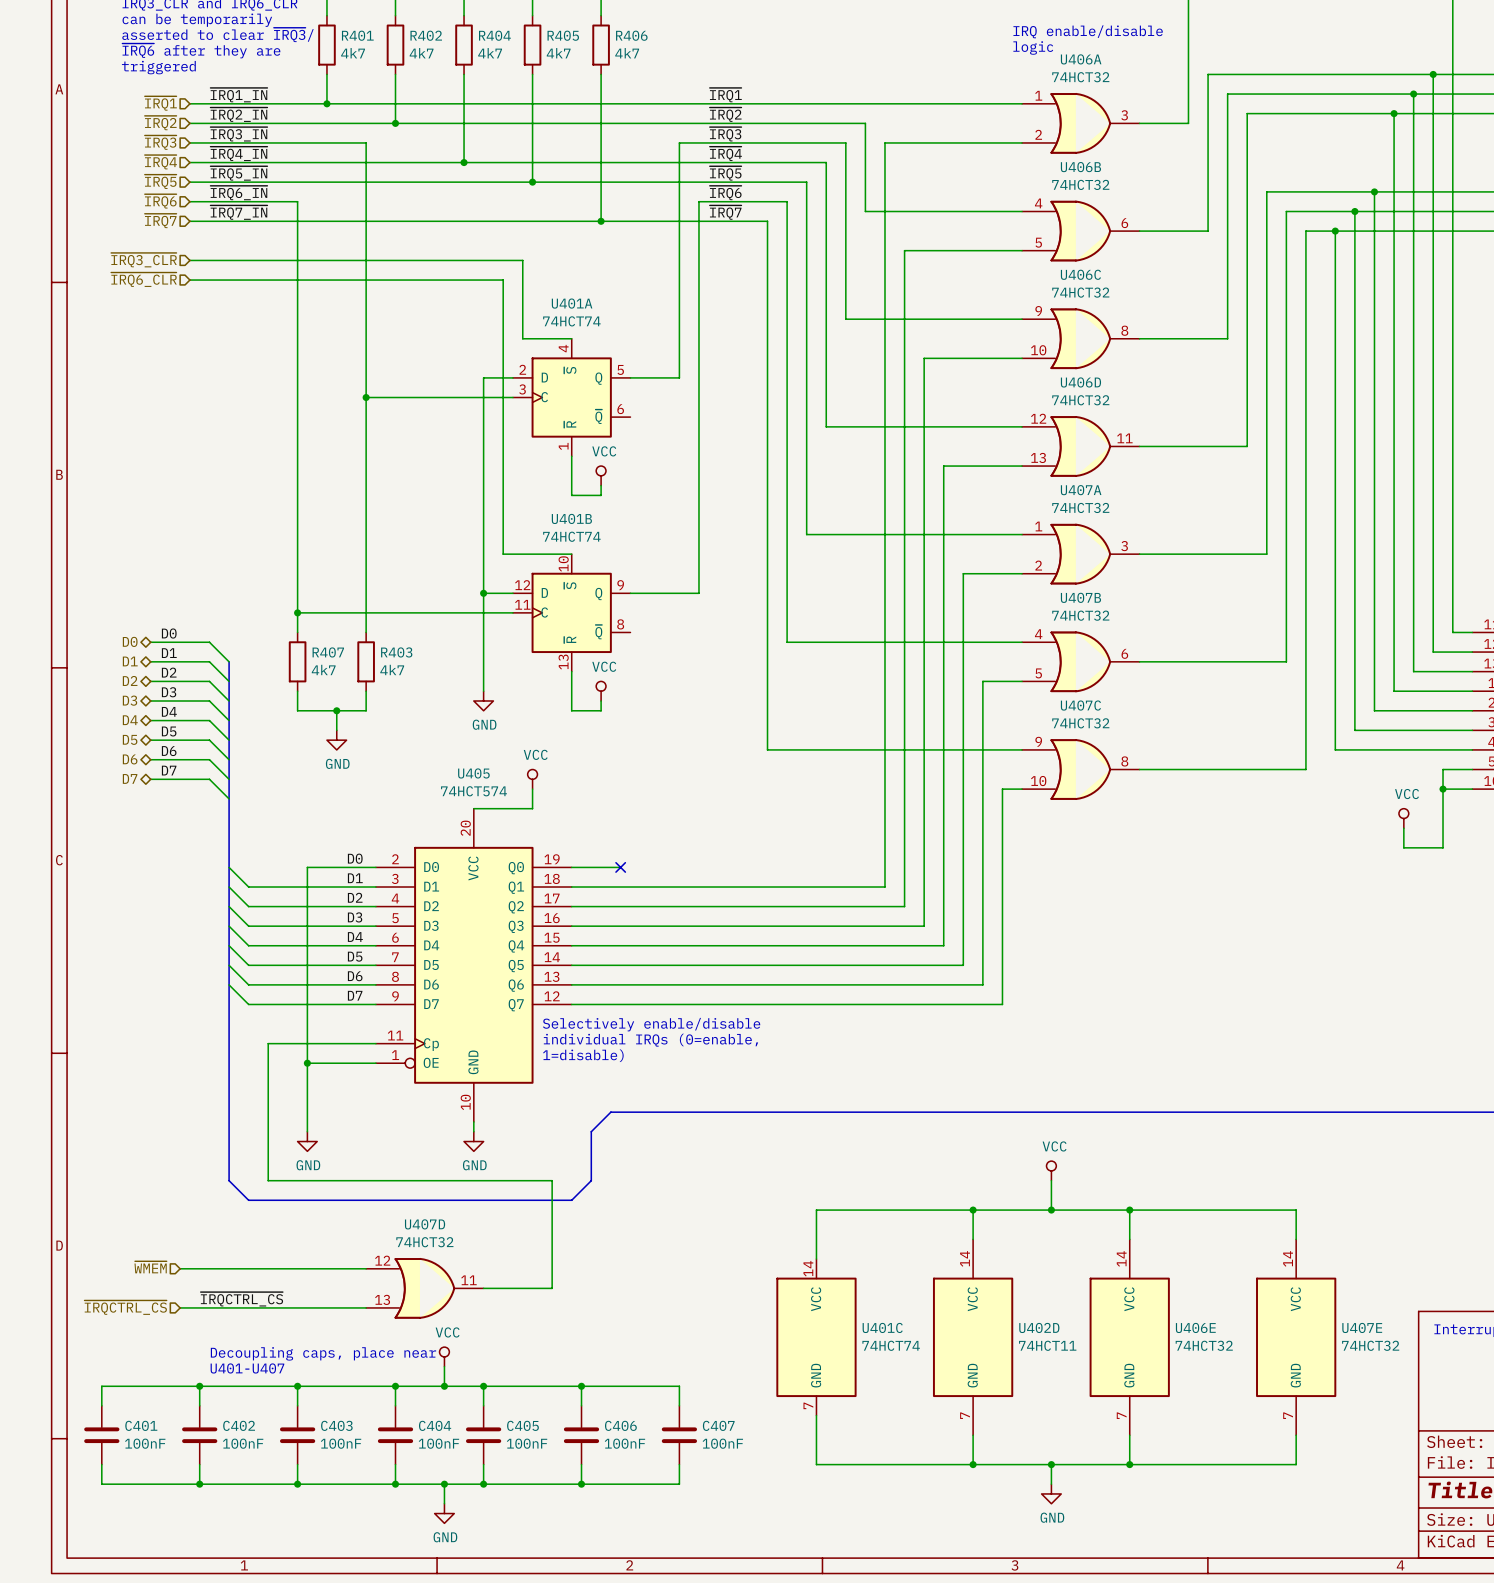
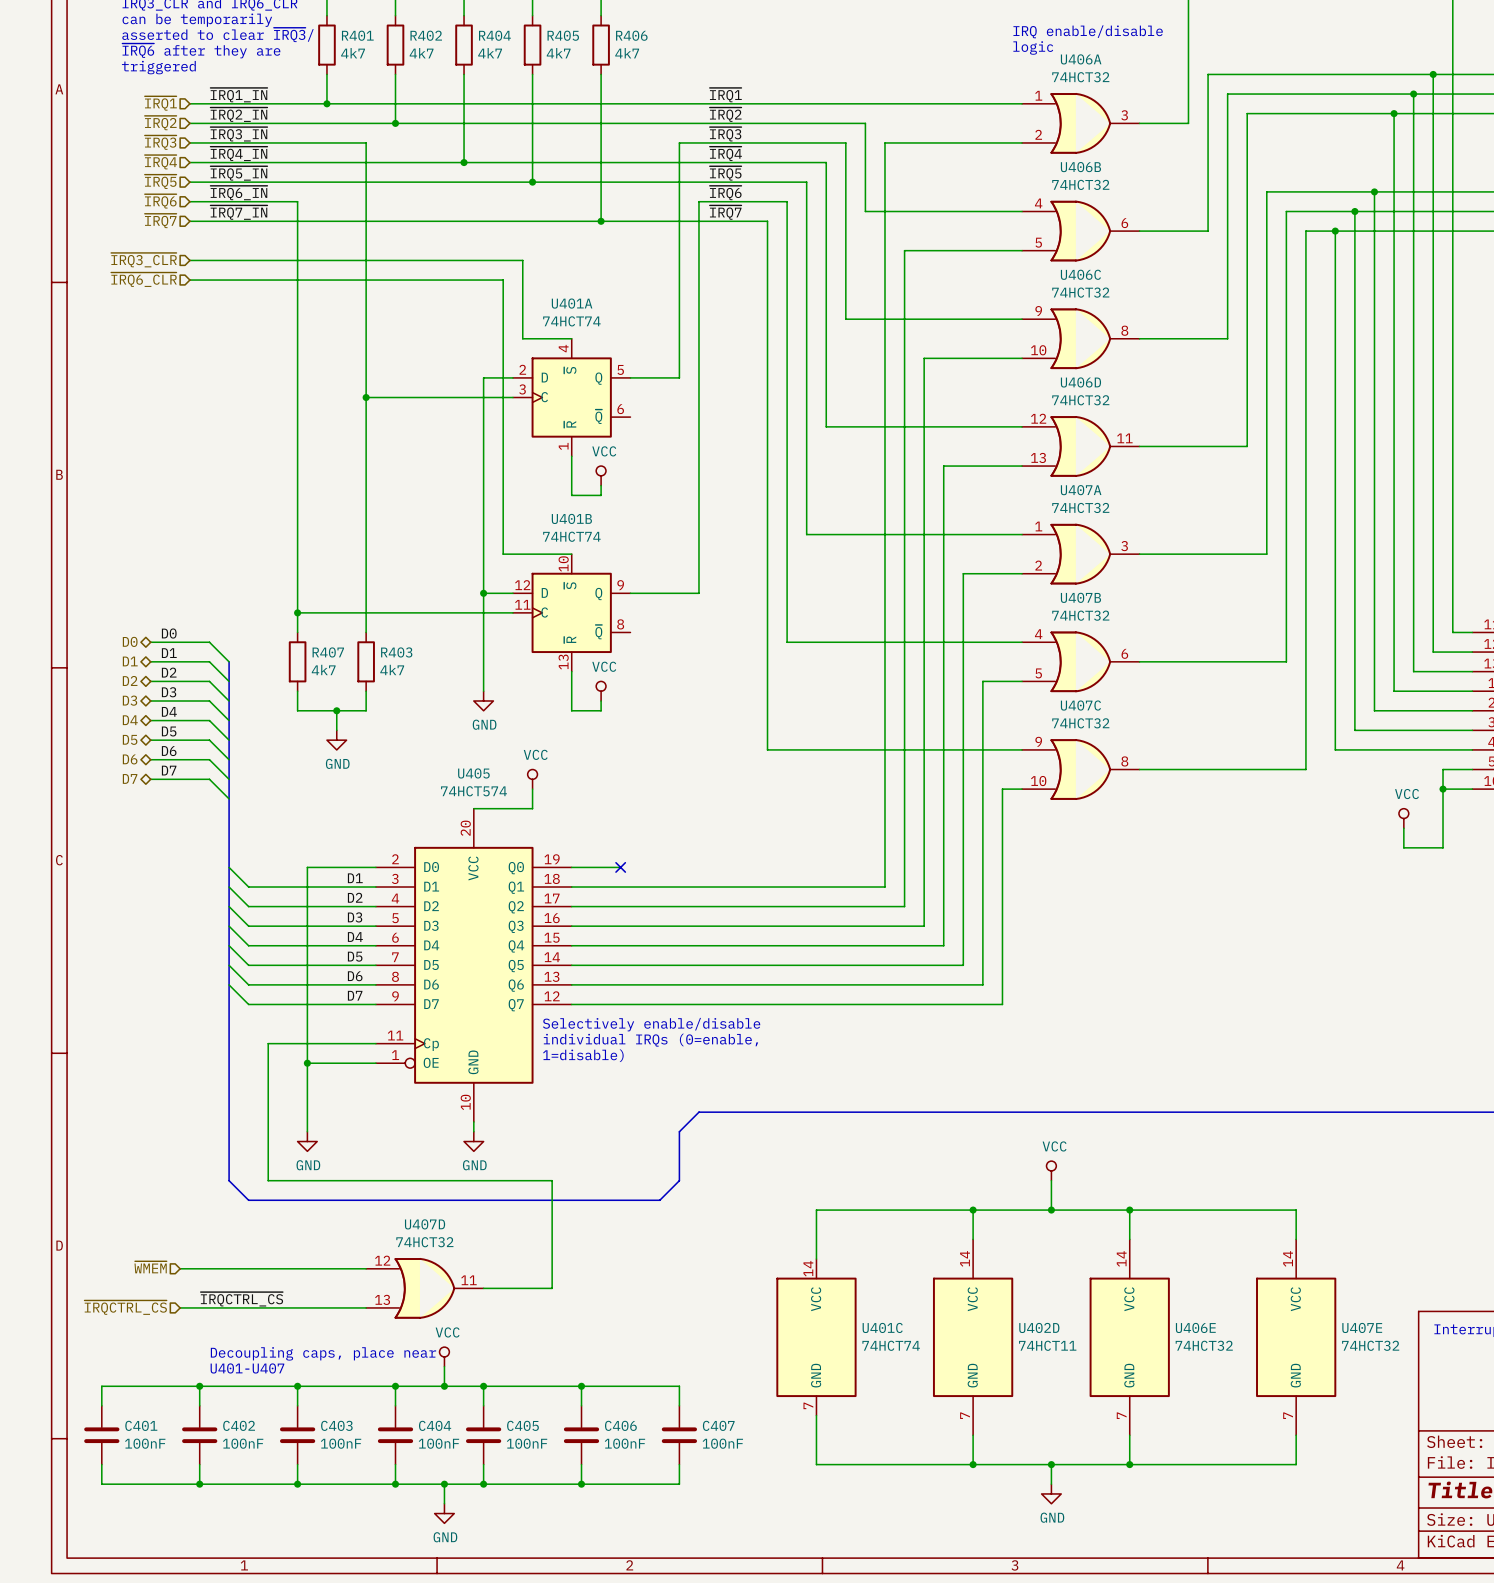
label: D0 (355, 858) -> none
bus: (698, 1112) (610, 1112) (591, 1131) (591, 1180) (571, 1200) -> (698, 1112) (679, 1131) (679, 1180) (659, 1200) (571, 1200)

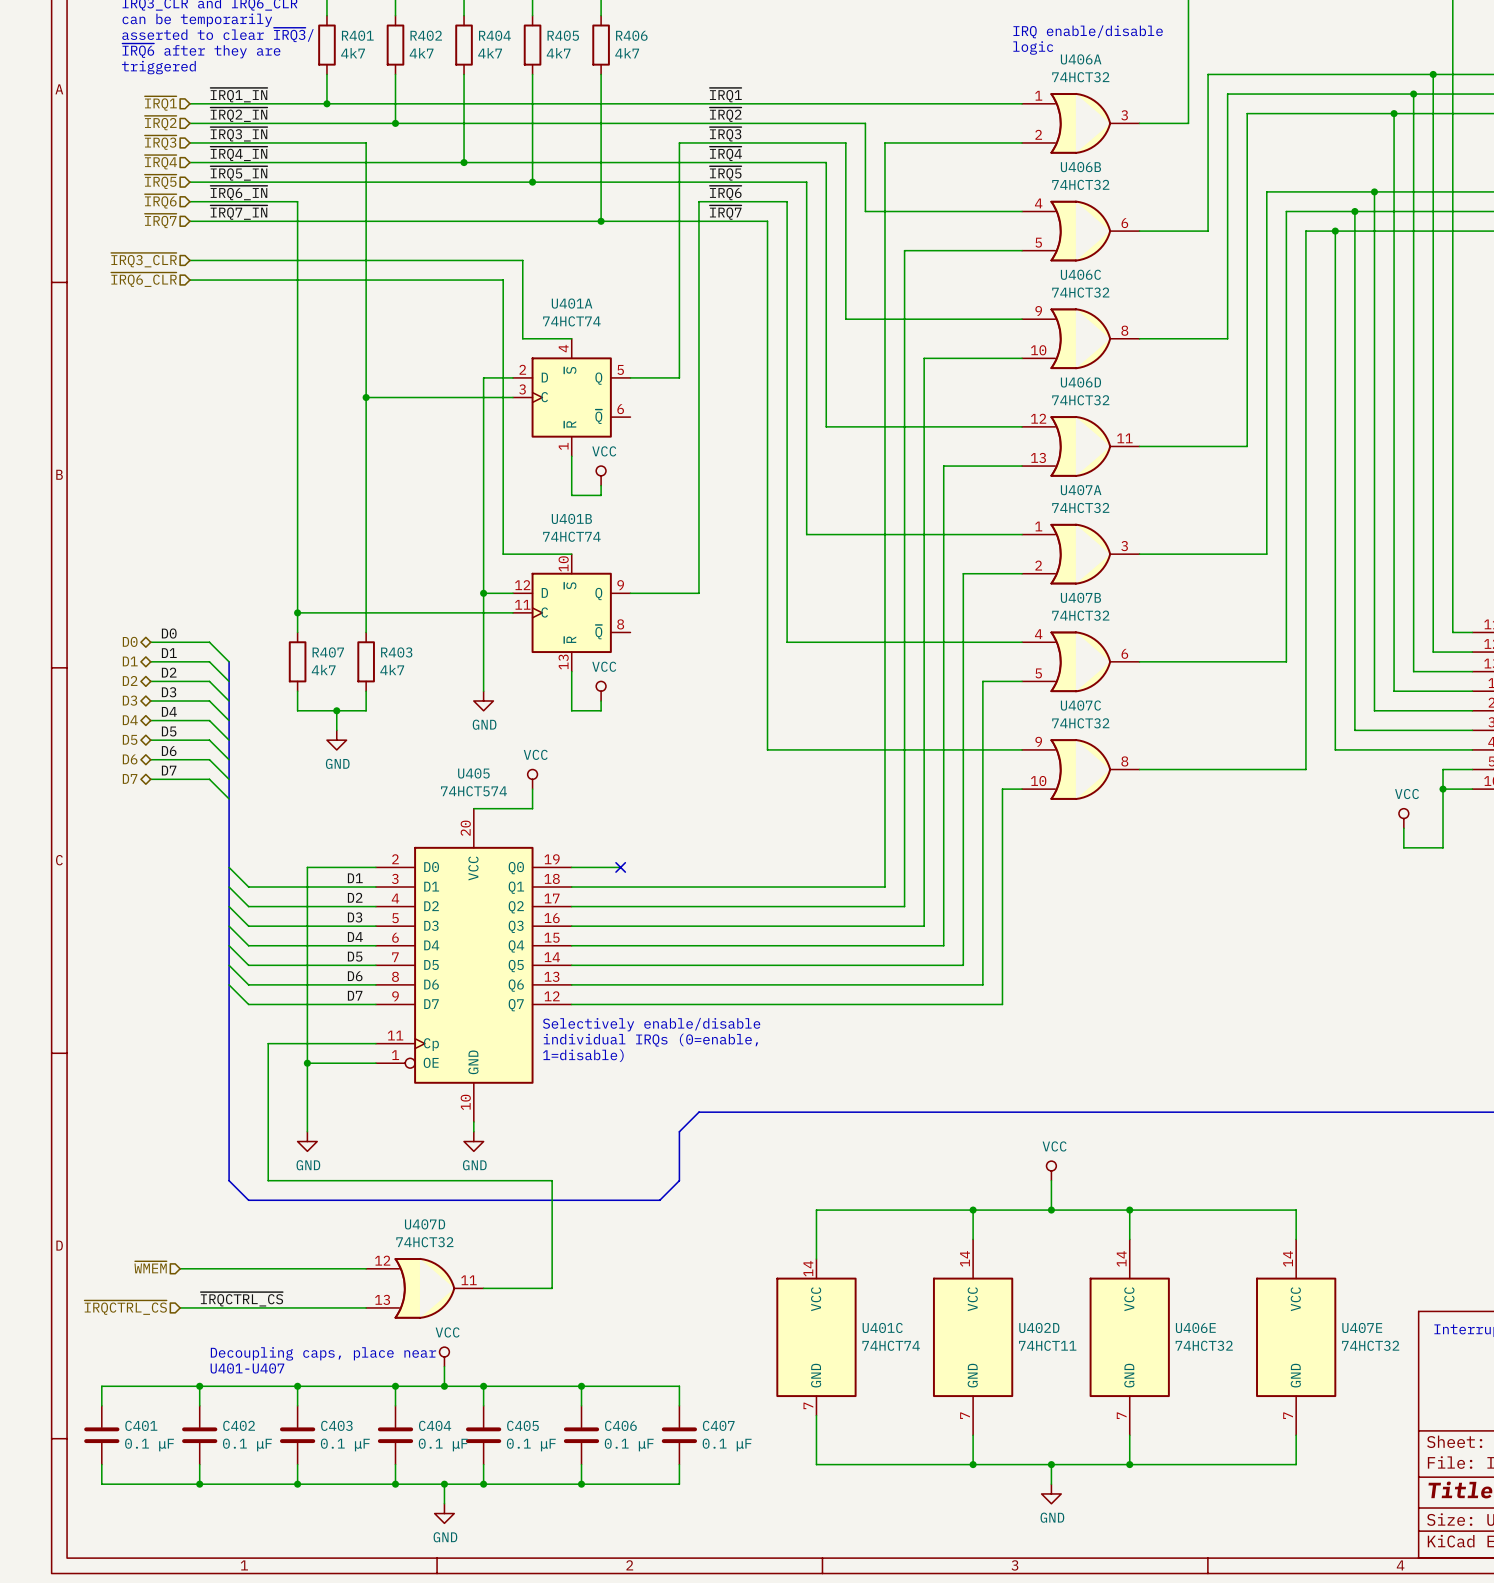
C401 value: 100nF (145, 1443) -> 0.1 μF (149, 1444)
C402 value: 100nF (243, 1443) -> 0.1 μF (247, 1444)
C403 value: 100nF (341, 1443) -> 0.1 μF (345, 1444)
C404 value: 100nF (438, 1443) -> 0.1 μF (443, 1444)
C405 value: 100nF (527, 1443) -> 0.1 μF (531, 1444)
C406 value: 100nF (624, 1443) -> 0.1 μF (629, 1444)
C407 value: 100nF (722, 1443) -> 0.1 μF (727, 1444)

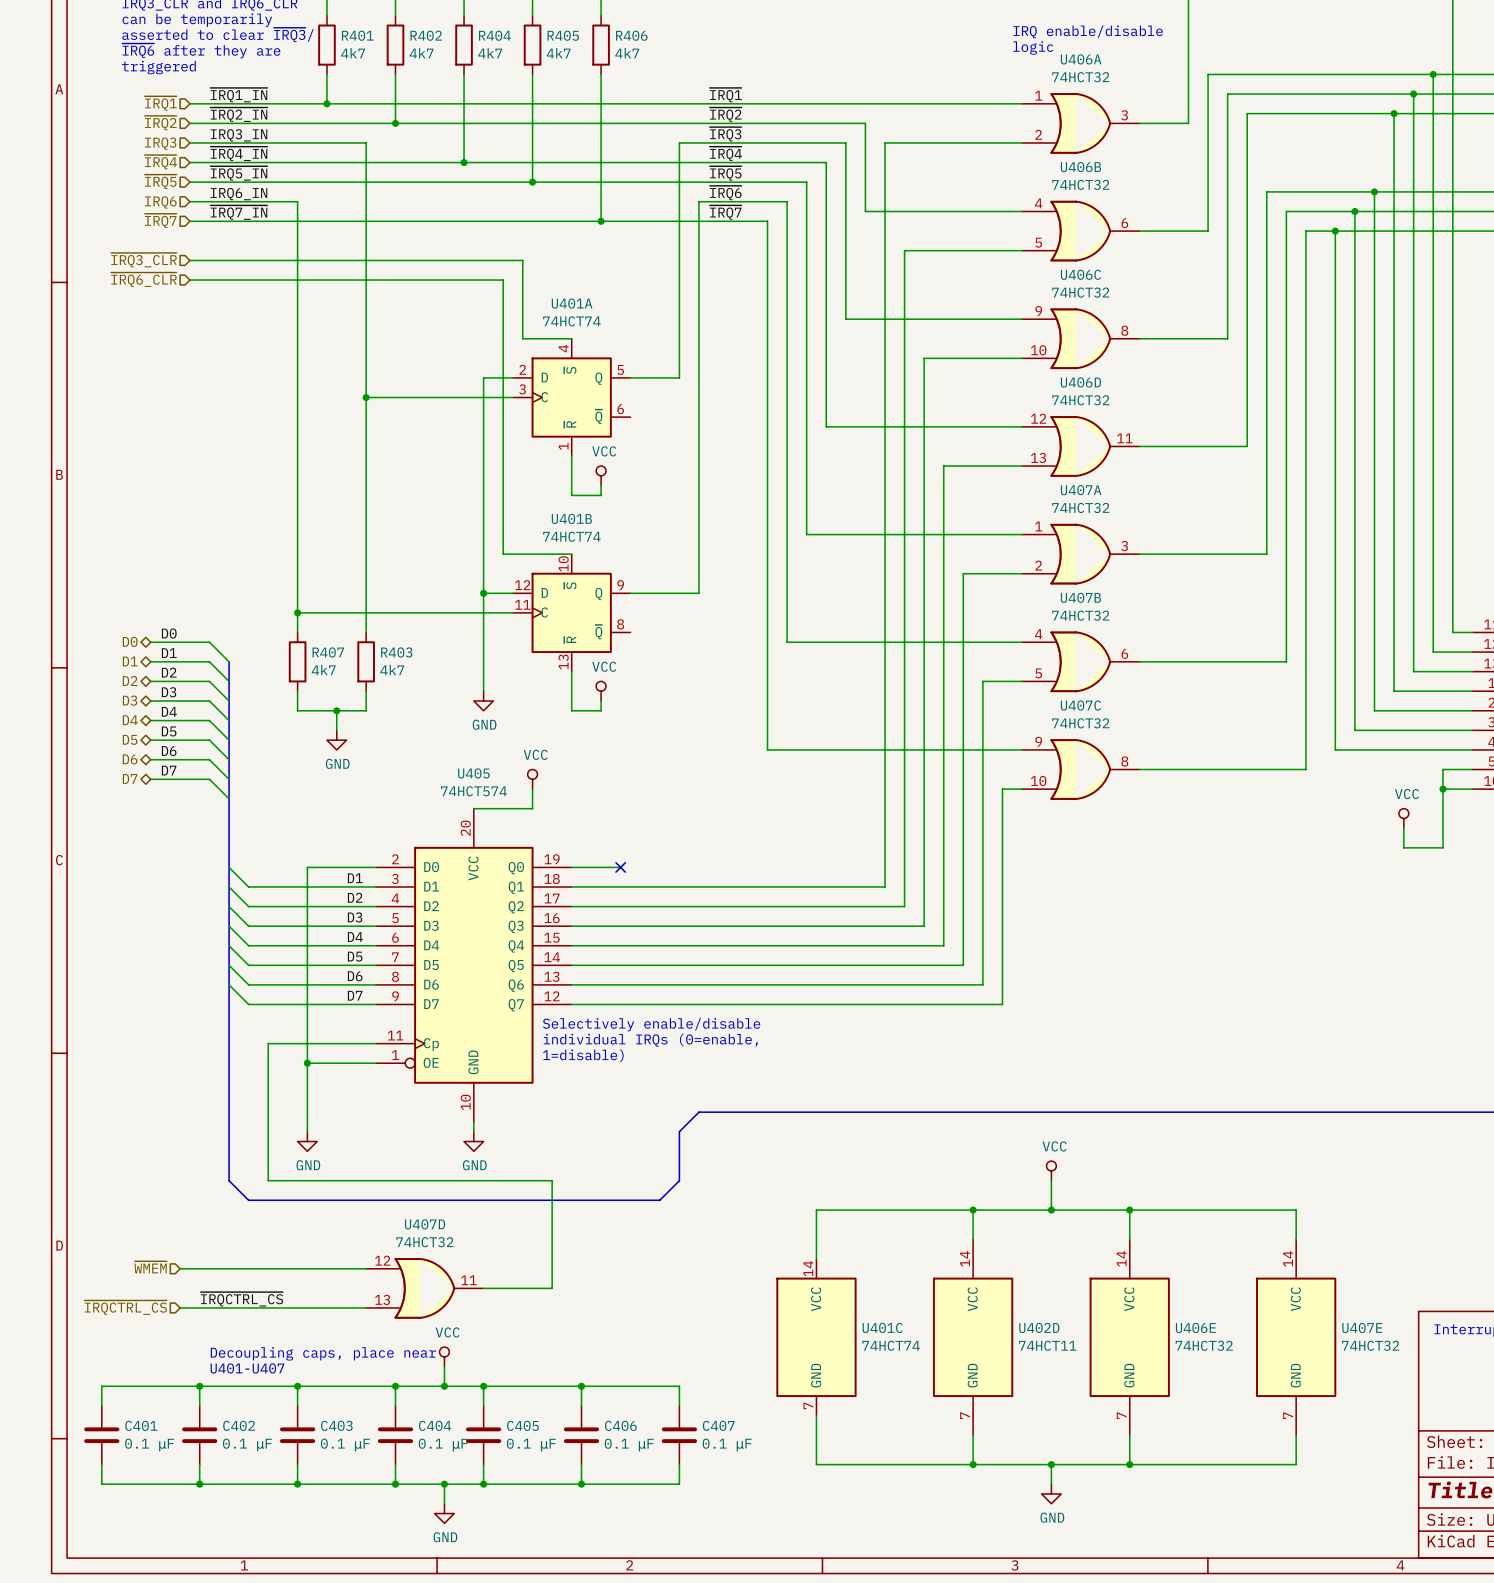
label: ~{IRQ3_IN} (238, 134) -> IRQ3_IN (238, 135)
hierarchical label: ~{IRQ3} (160, 142) -> IRQ3 (160, 143)
label: ~{IRQ6_IN} (238, 193) -> IRQ6_IN (238, 194)
hierarchical label: ~{IRQ6} (160, 201) -> IRQ6 (160, 202)

